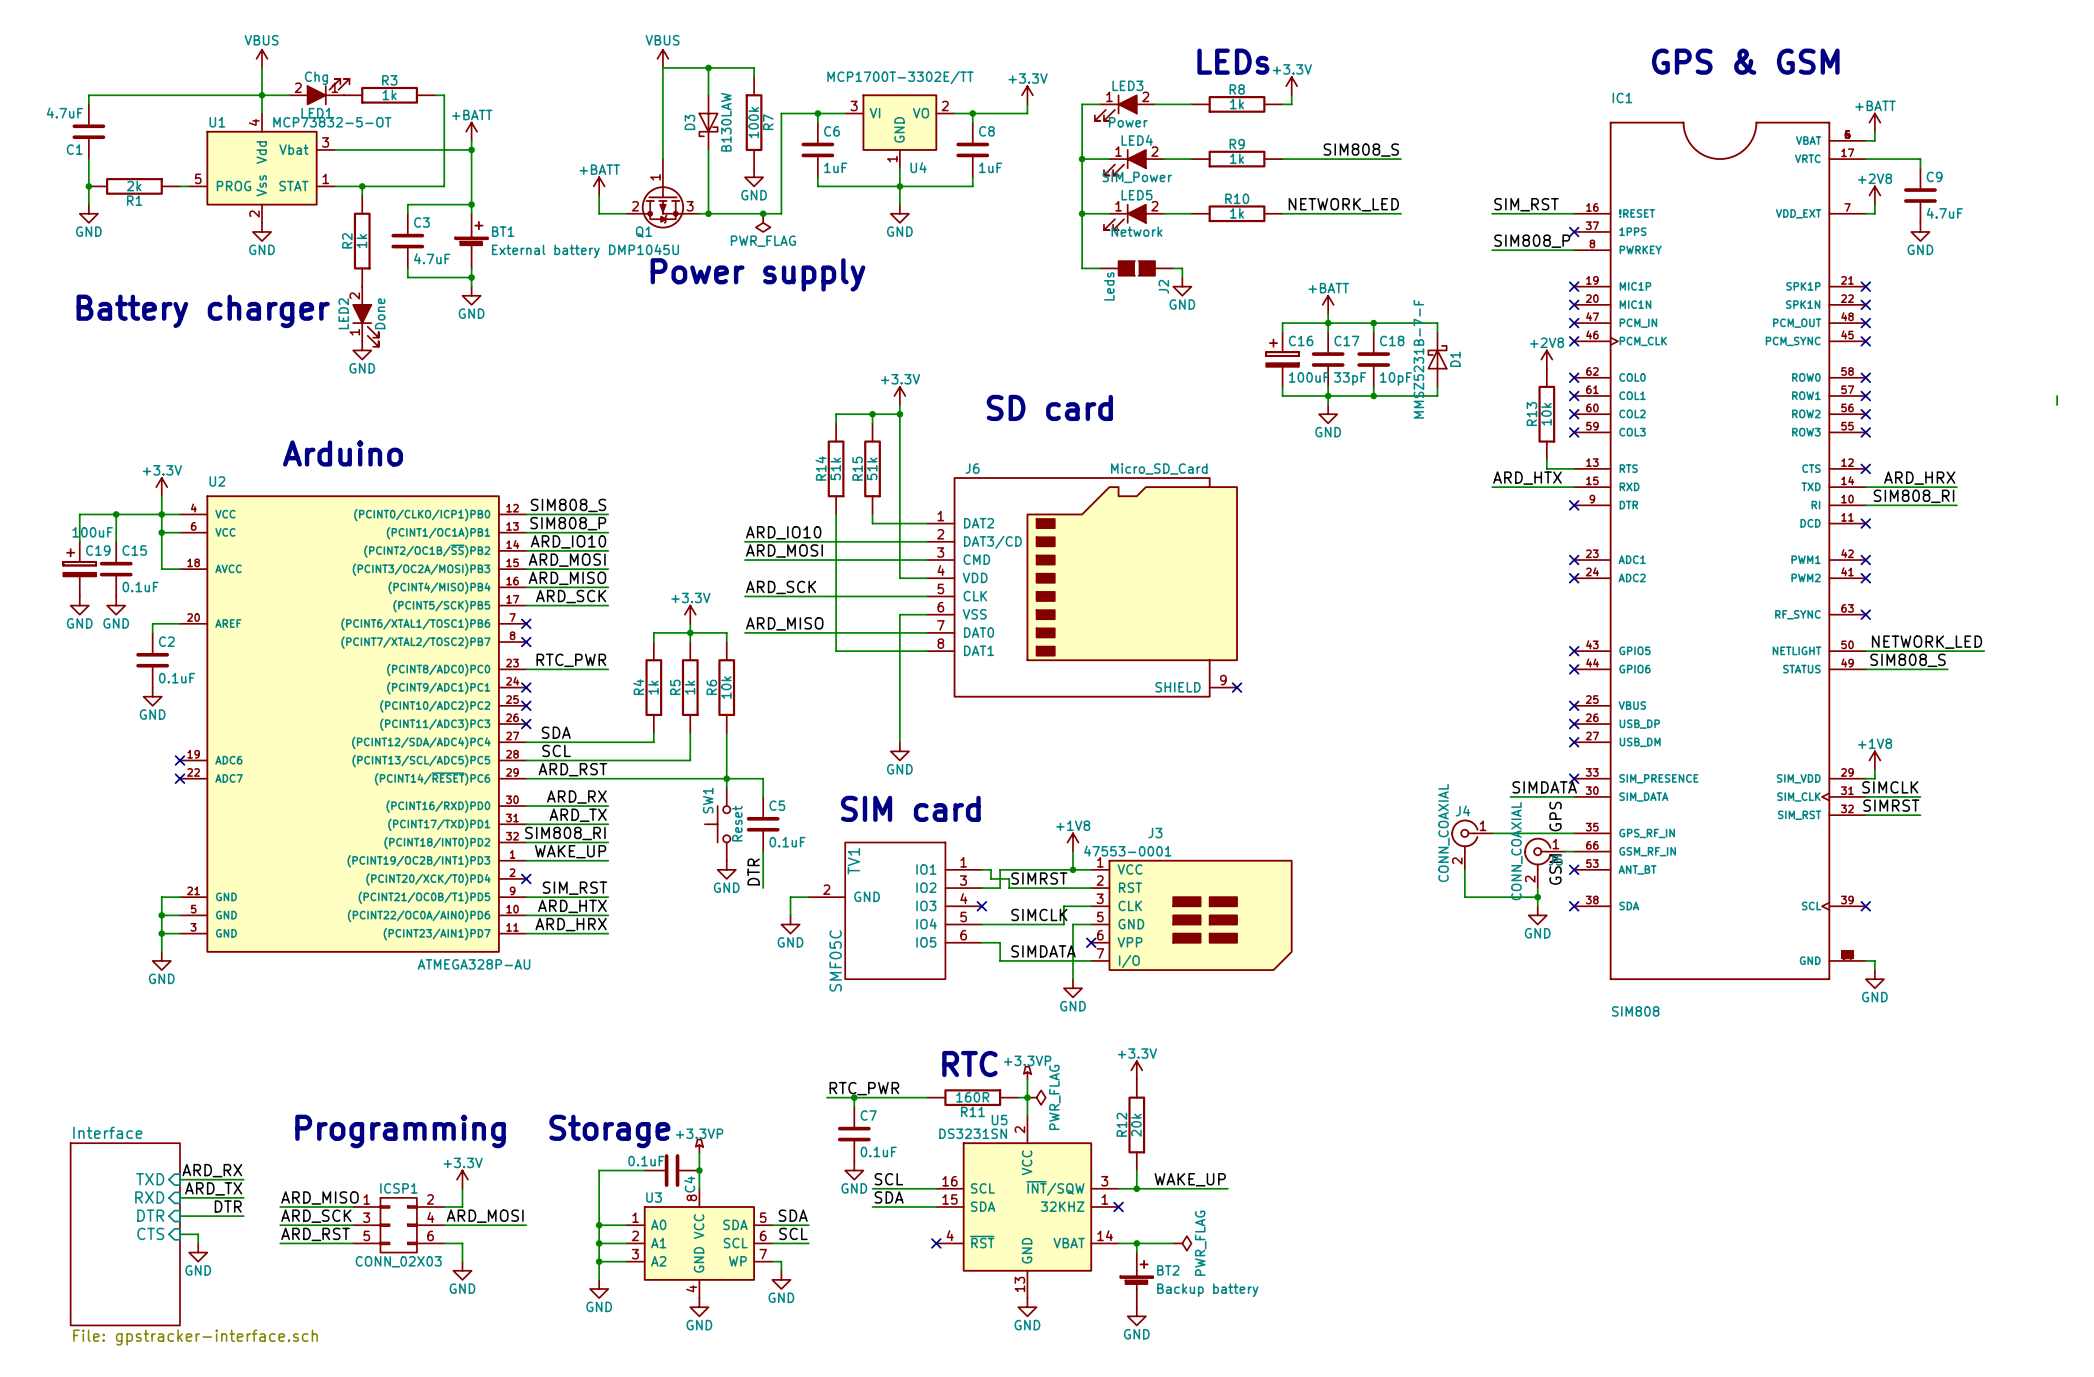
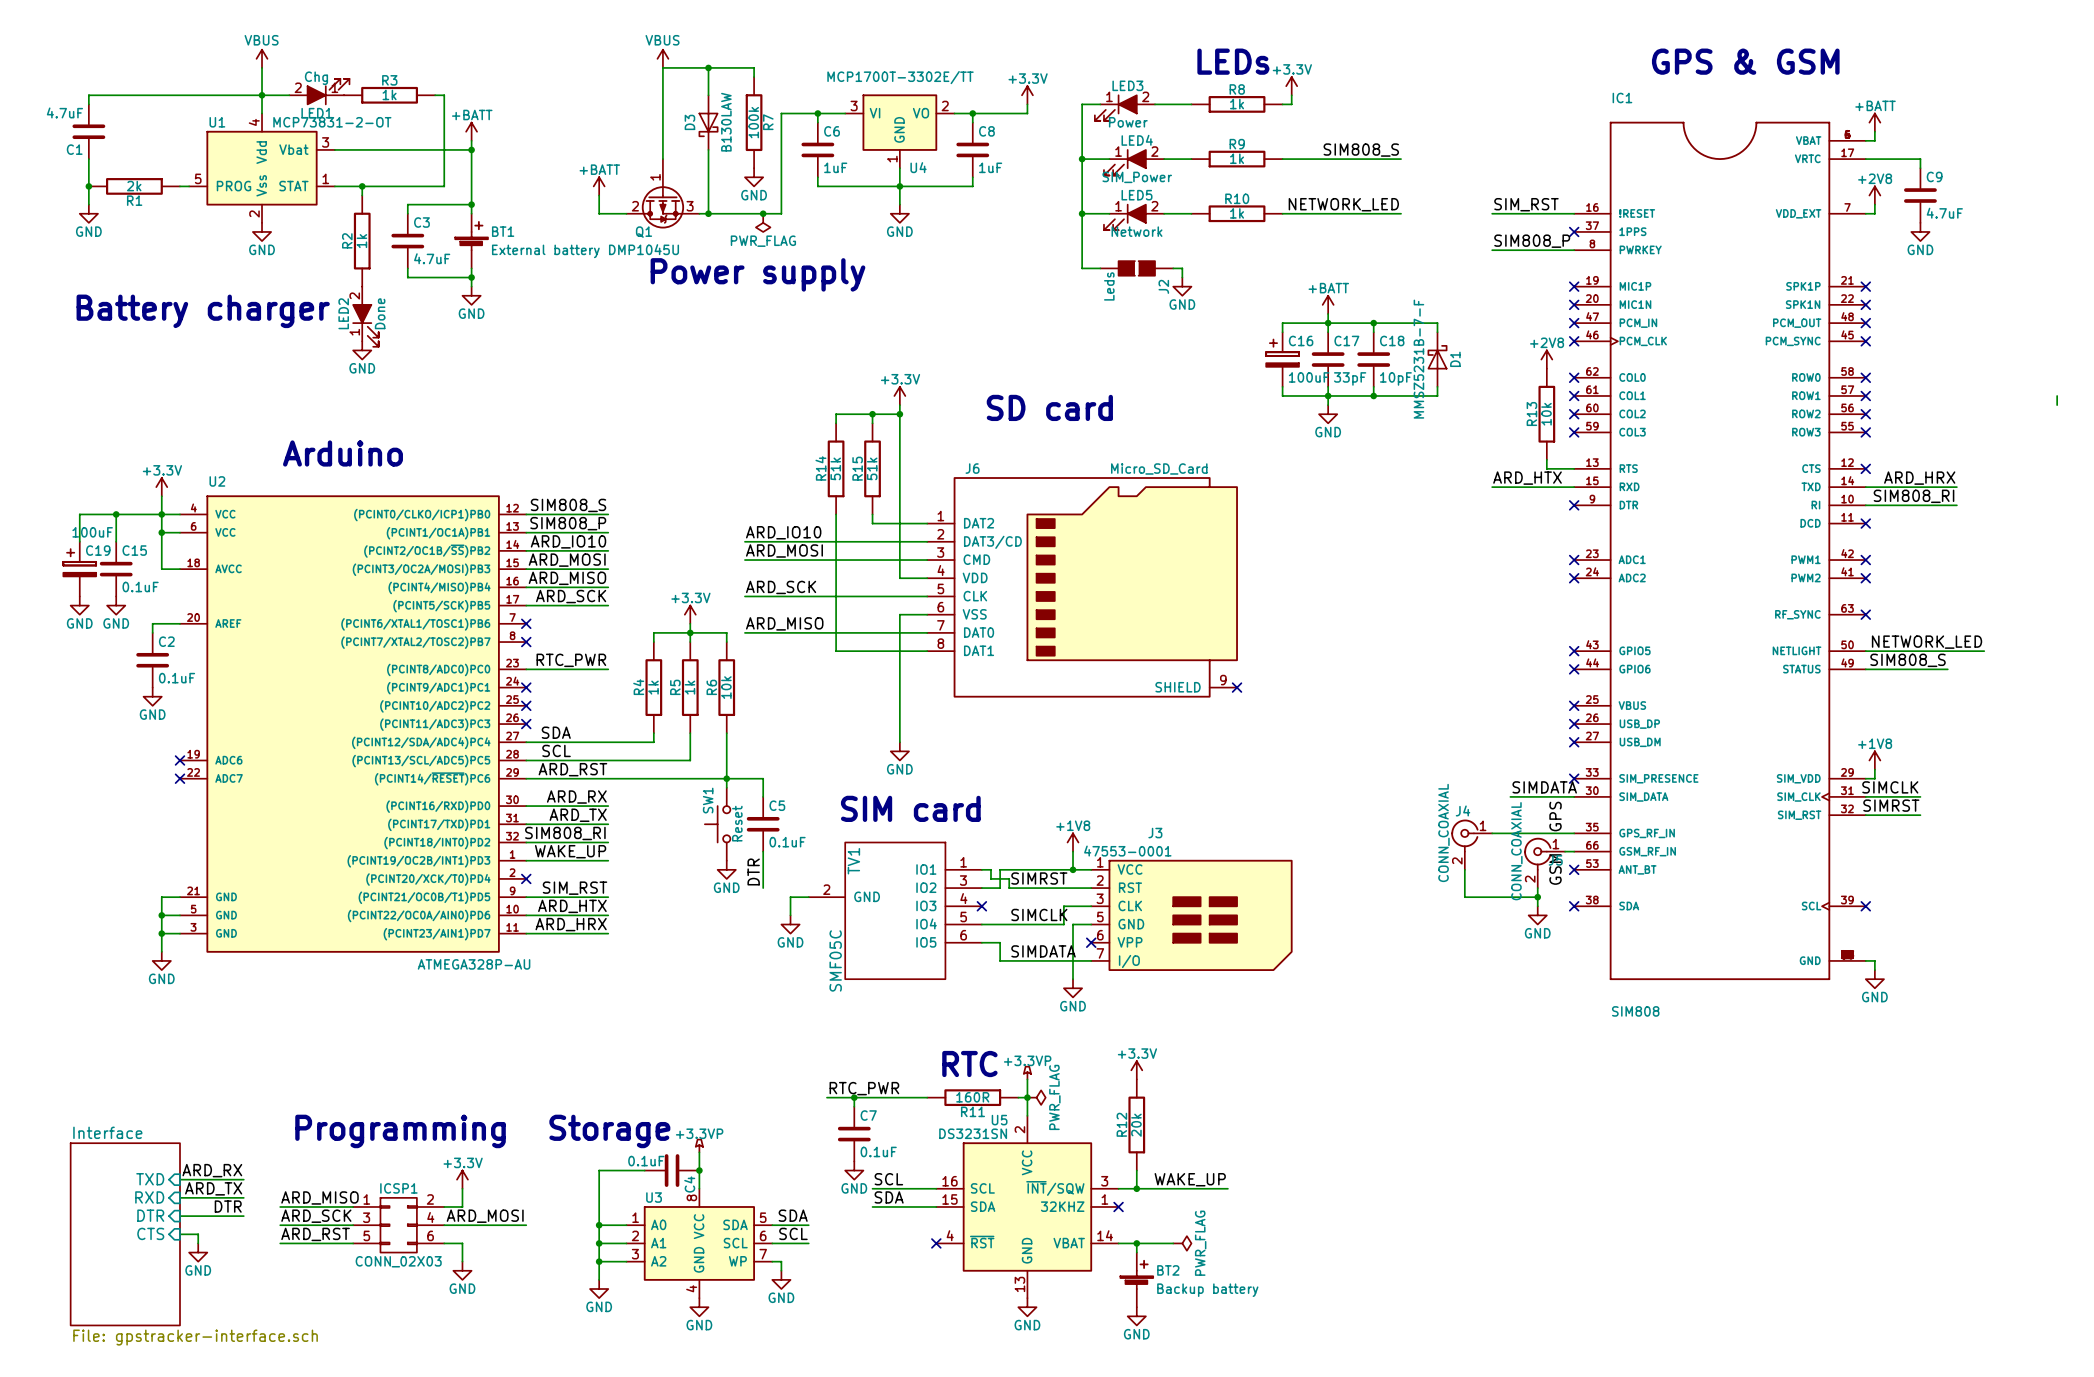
U1 value: MCP73832-5-OT (332, 122) -> MCP73831-2-OT (332, 122)

